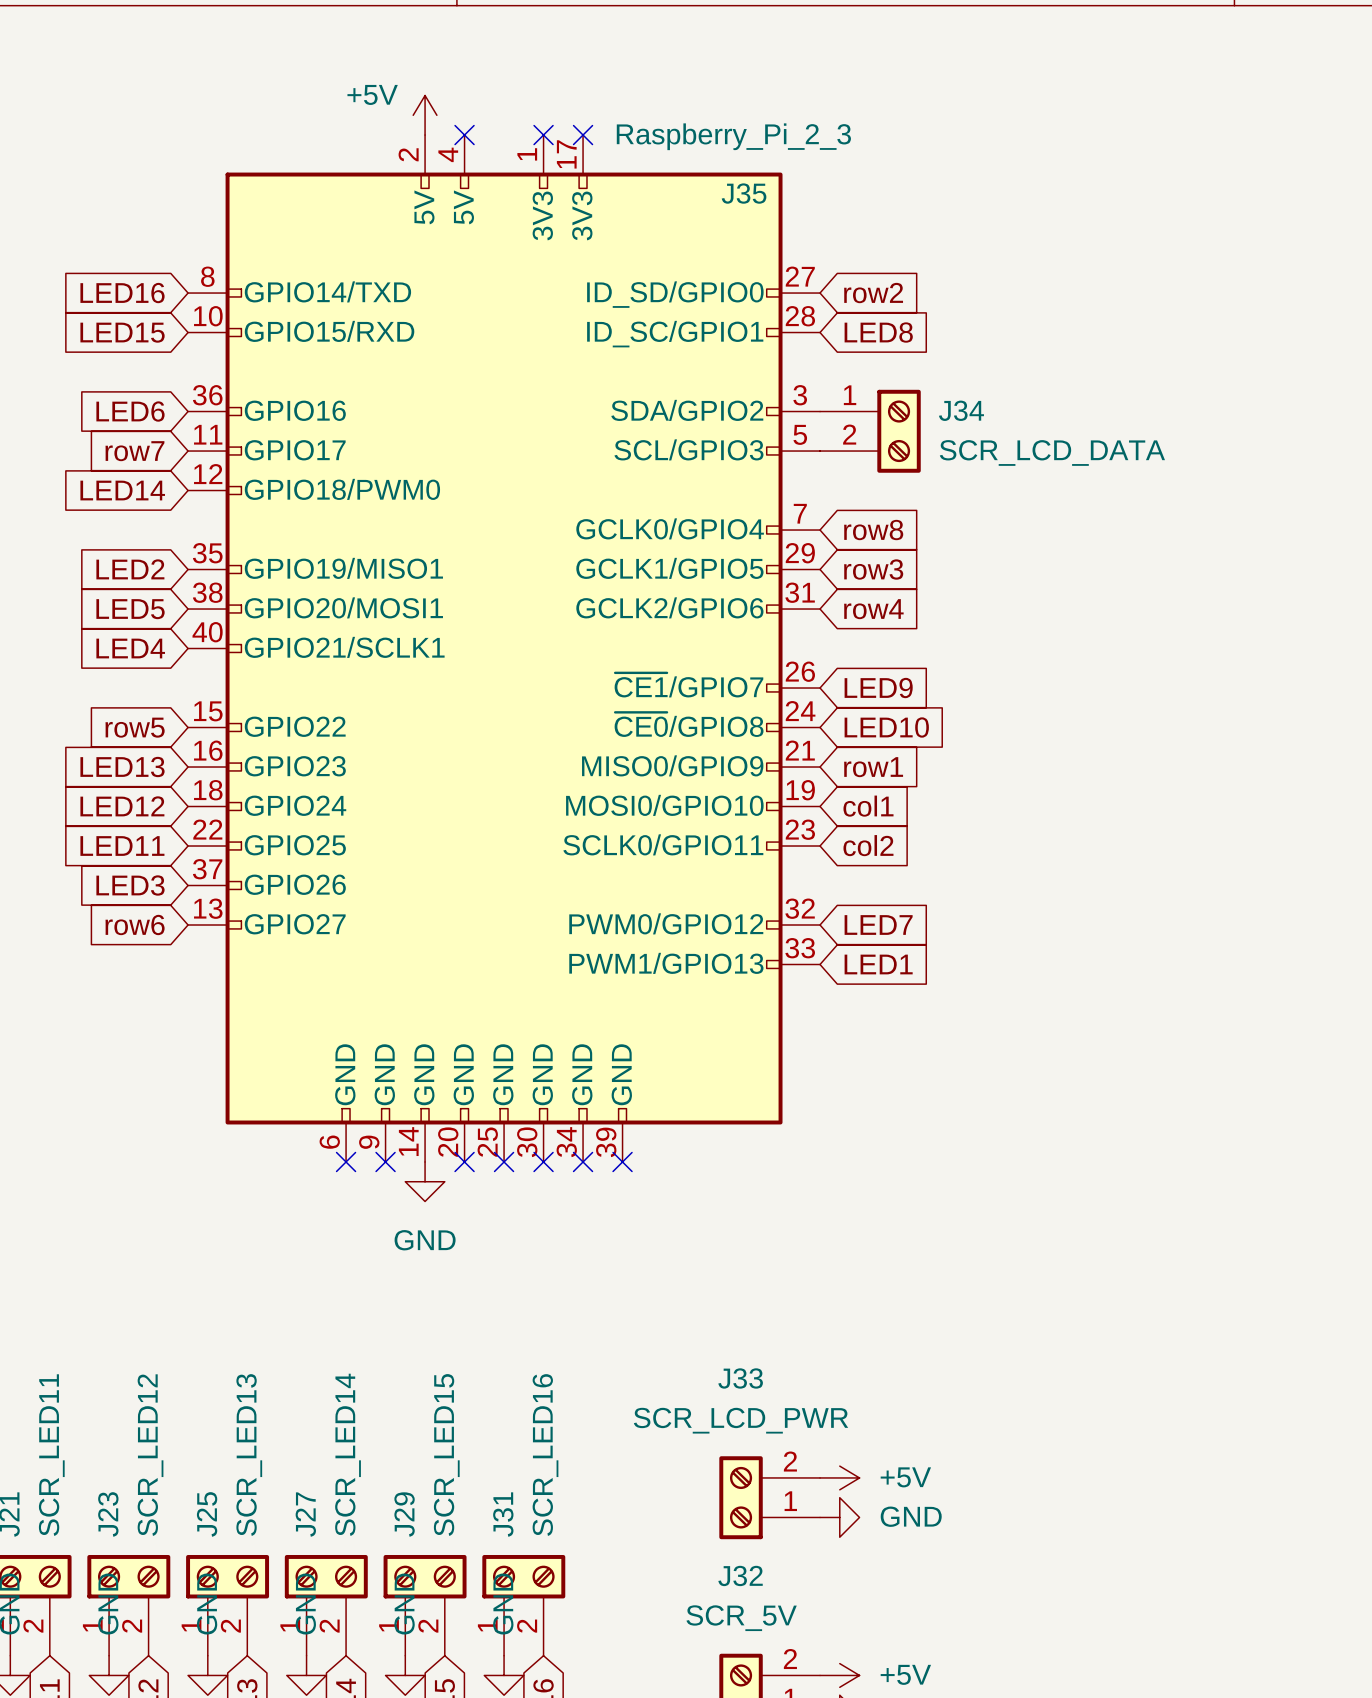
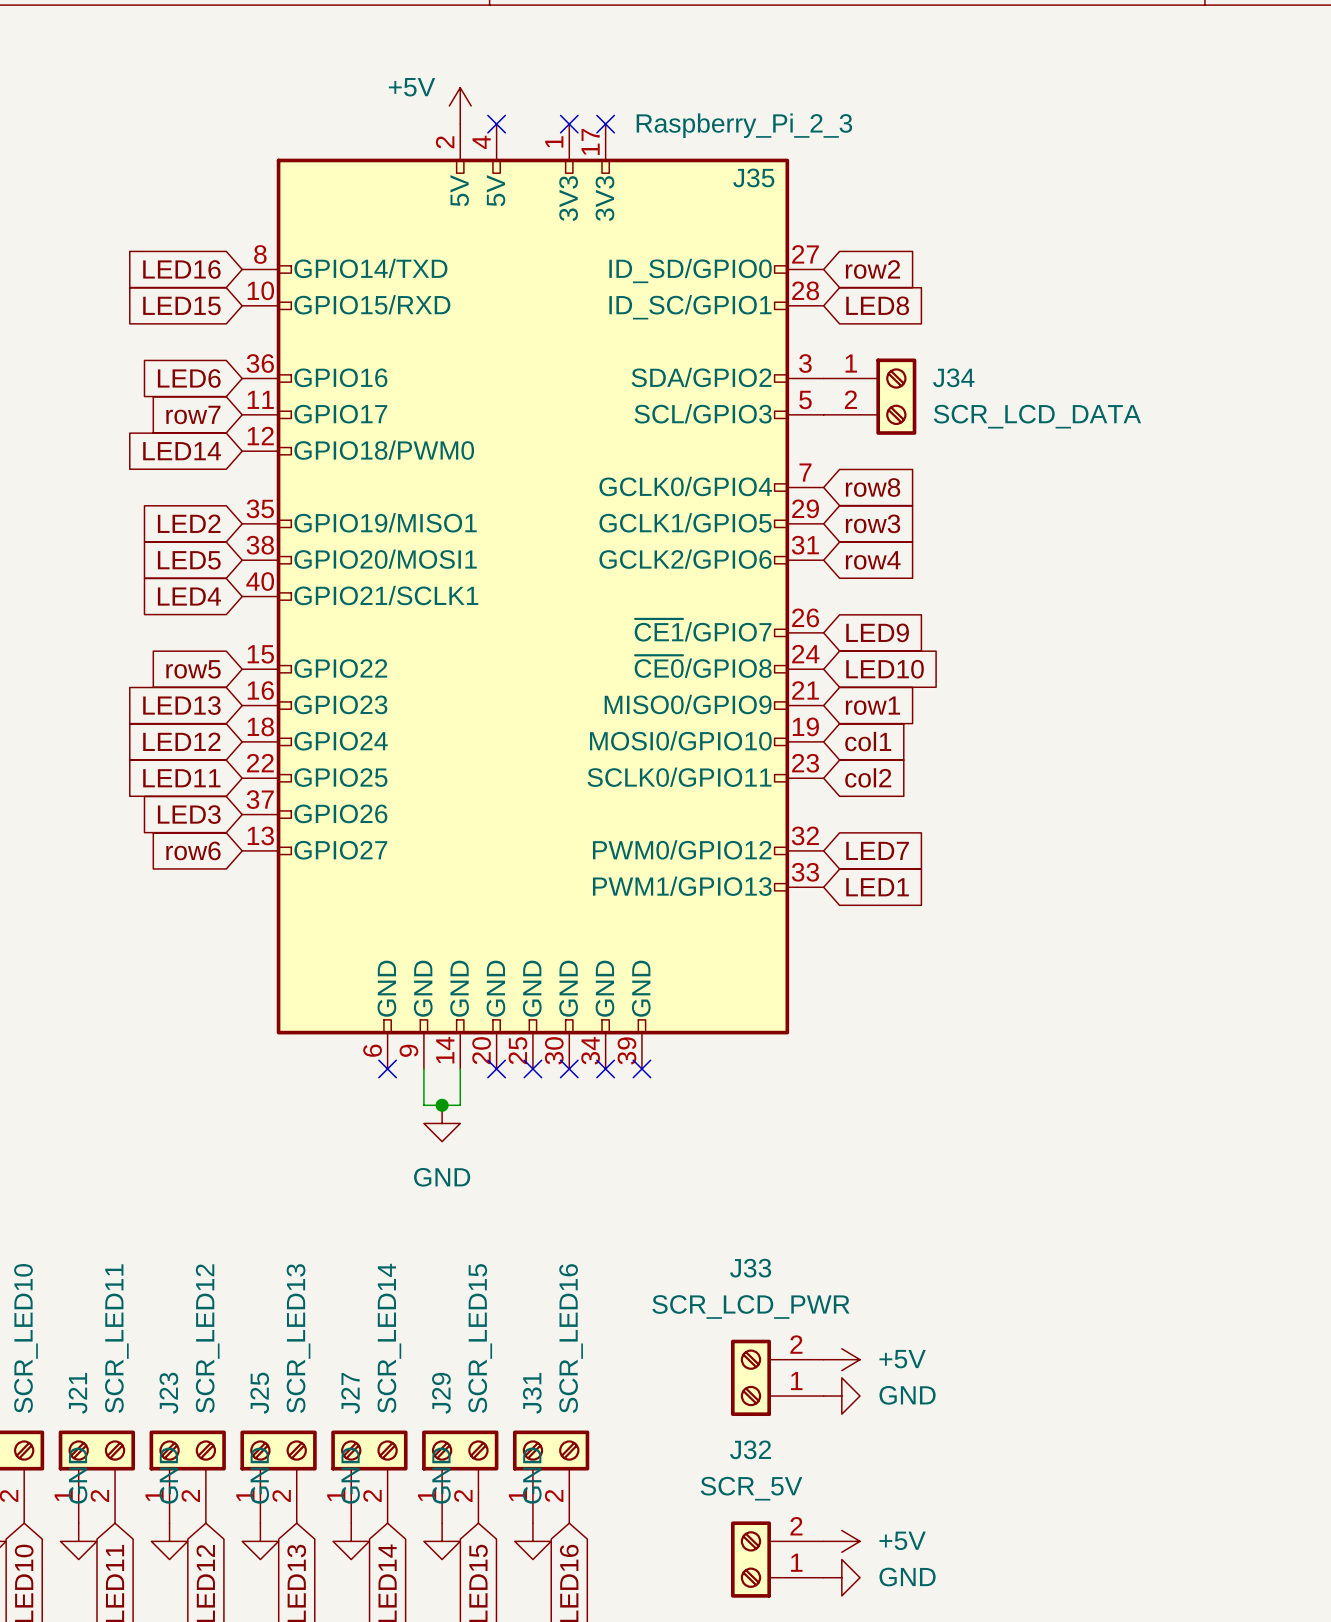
wire: none -> (423, 1068) (423, 1105) (460, 1105) (460, 1068)
no-connect mark: (385, 1161) -> none
power symbol position: GND (425, 1181) -> GND (442, 1123)
junction: none -> (442, 1105)

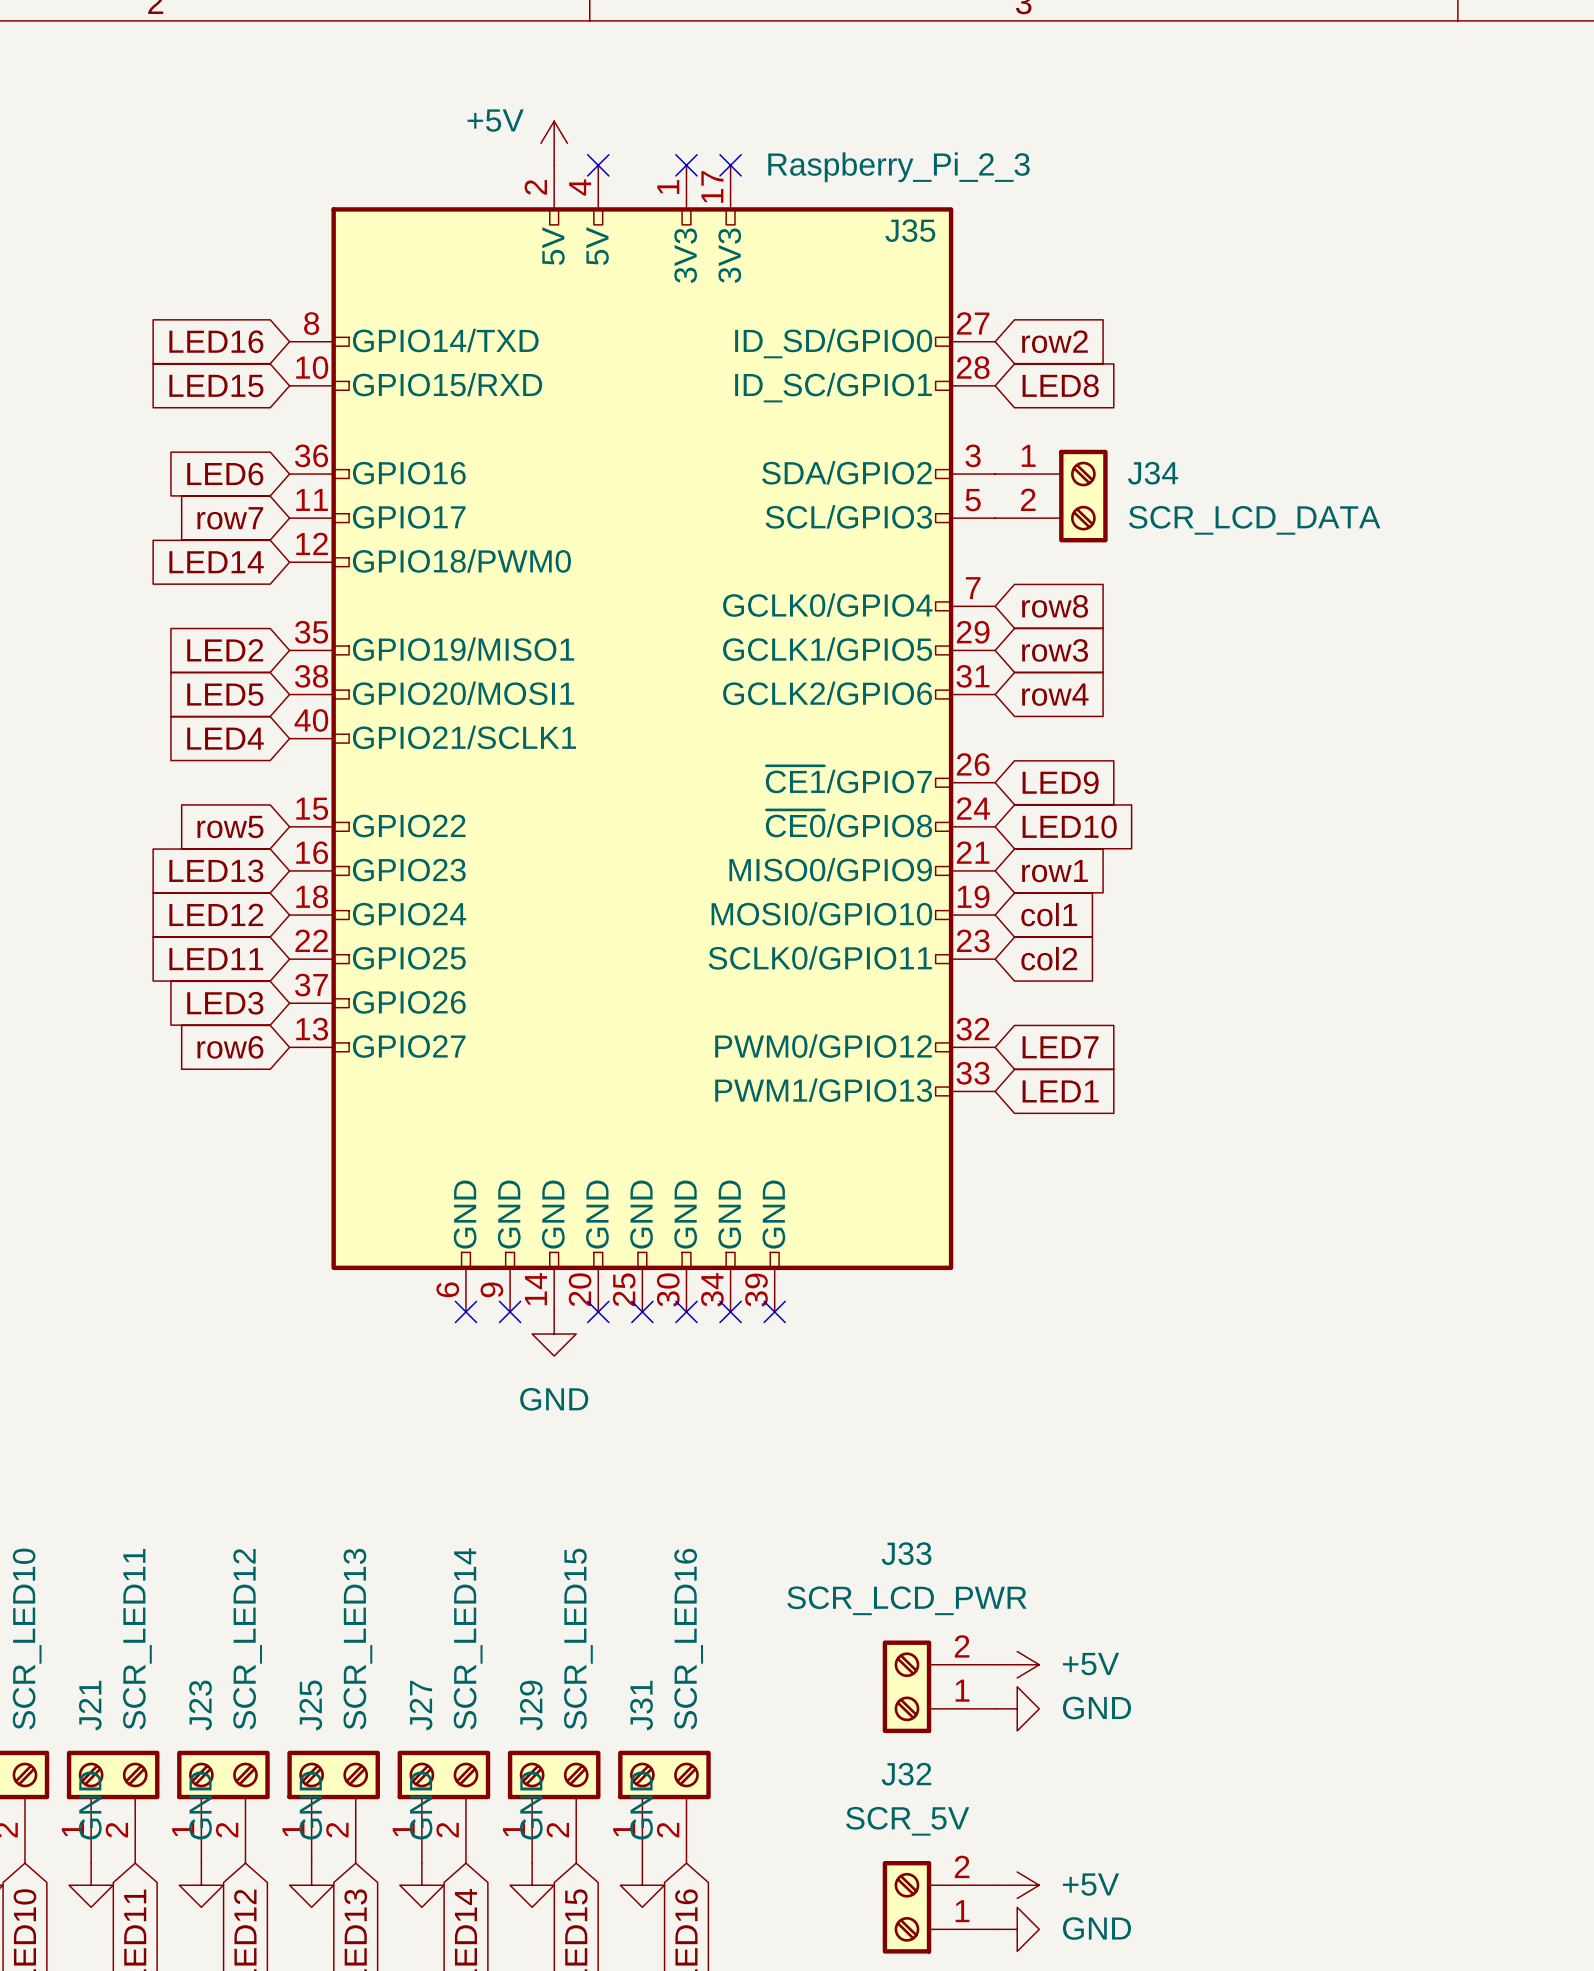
wire: (423, 1068) (423, 1105) (460, 1105) (460, 1068) -> none
no-connect mark: none -> (510, 1311)
junction: (442, 1105) -> none
power symbol position: GND (442, 1123) -> GND (554, 1333)

